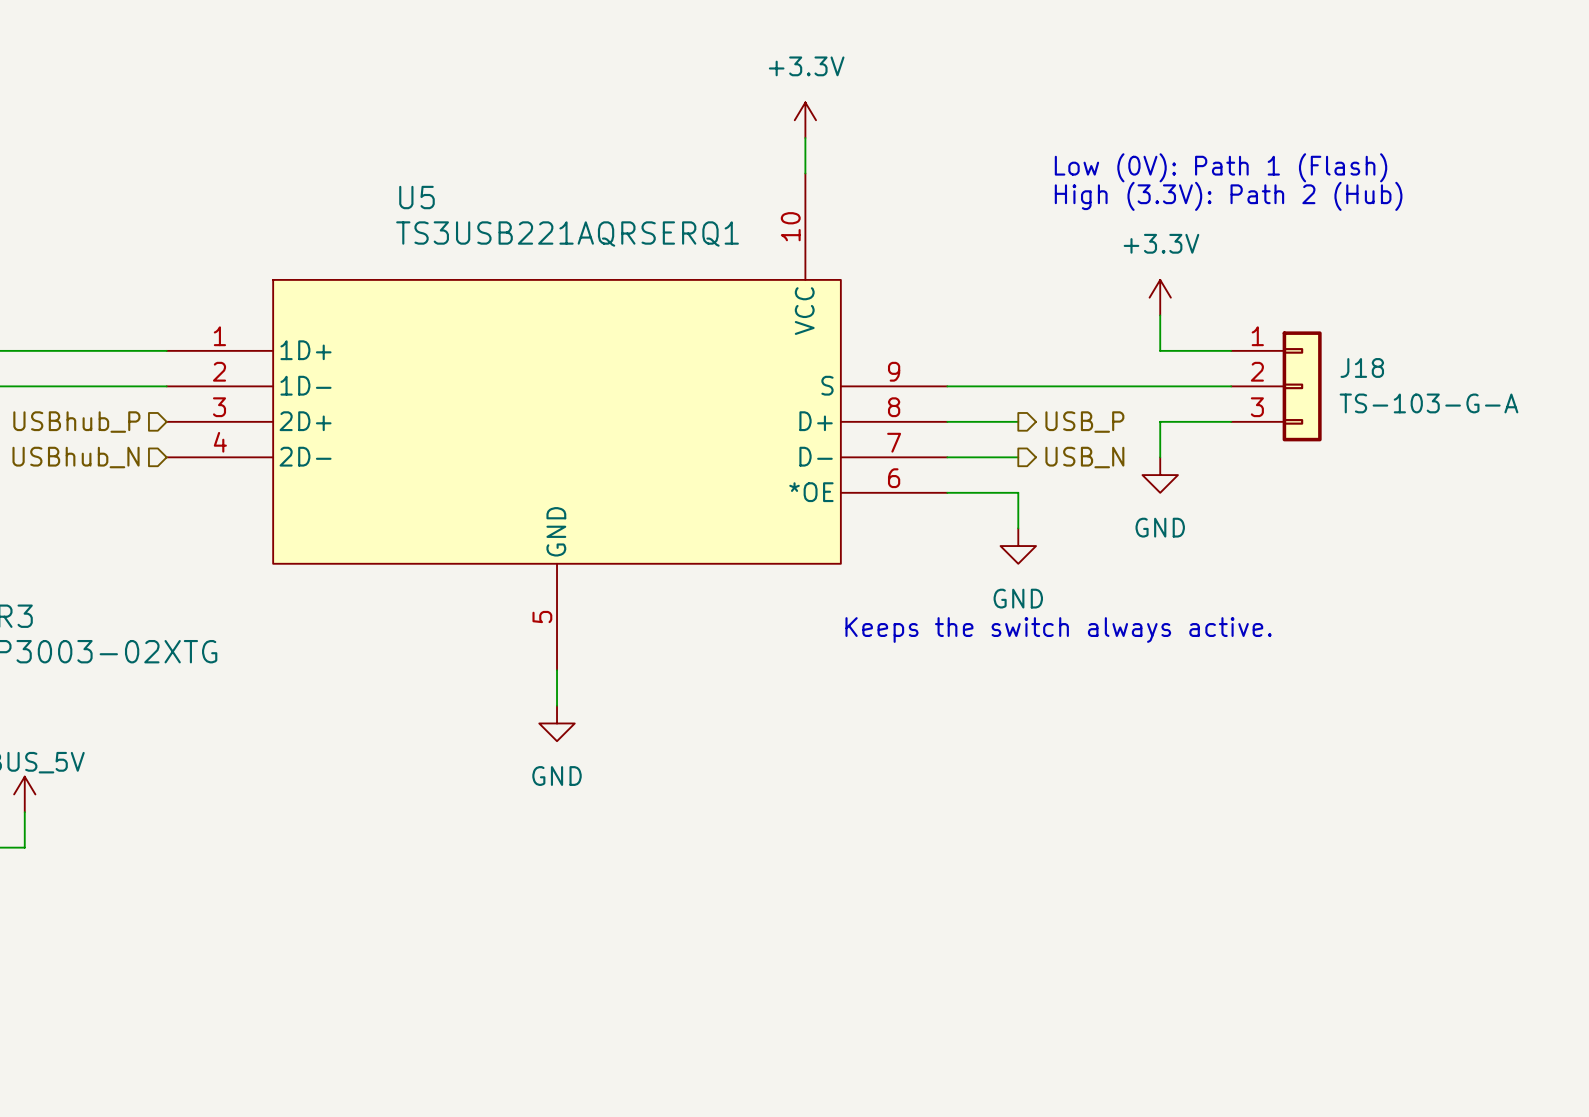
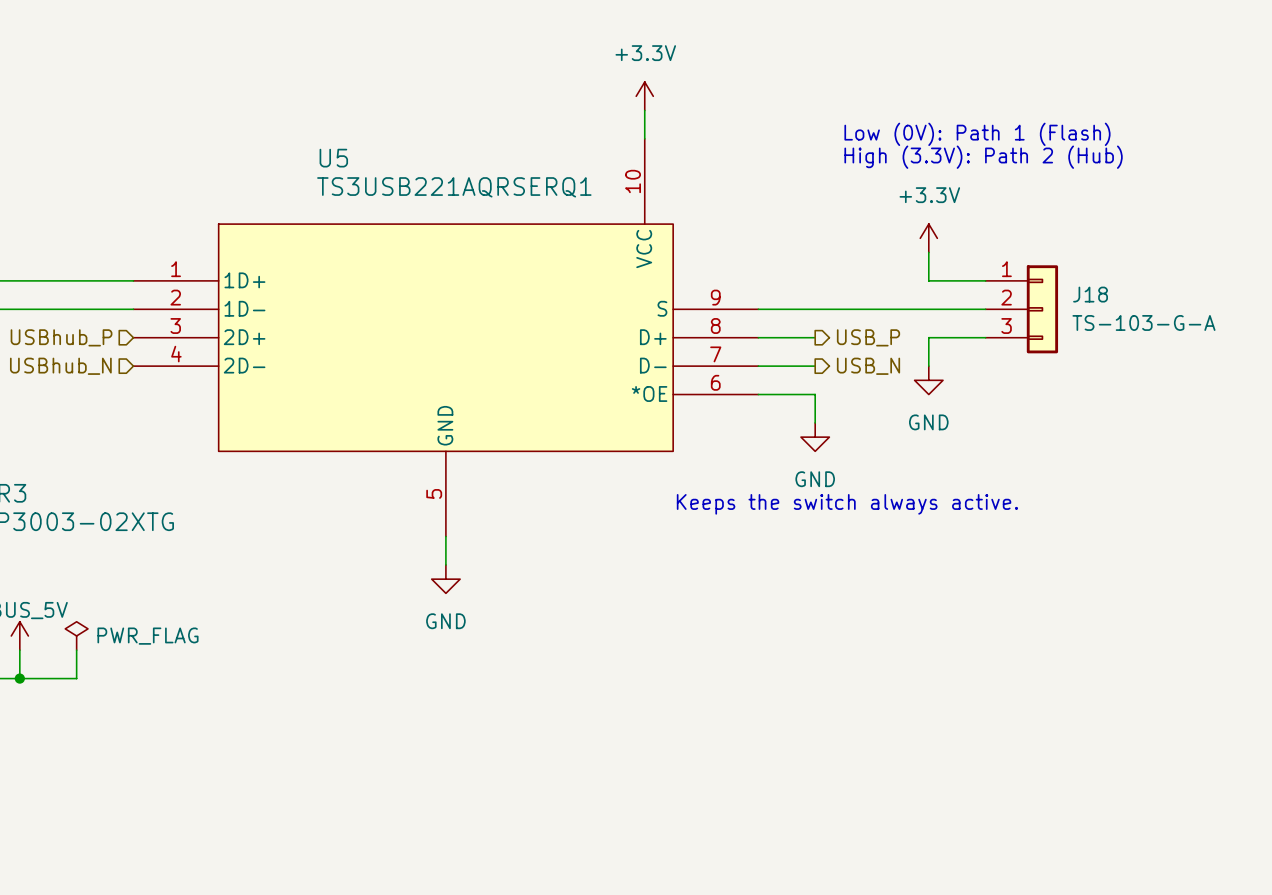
power symbol: none -> PWR_FLAG (76, 635)
wire: none -> (76, 650) (76, 678) (19, 678)
junction: none -> (19, 678)

